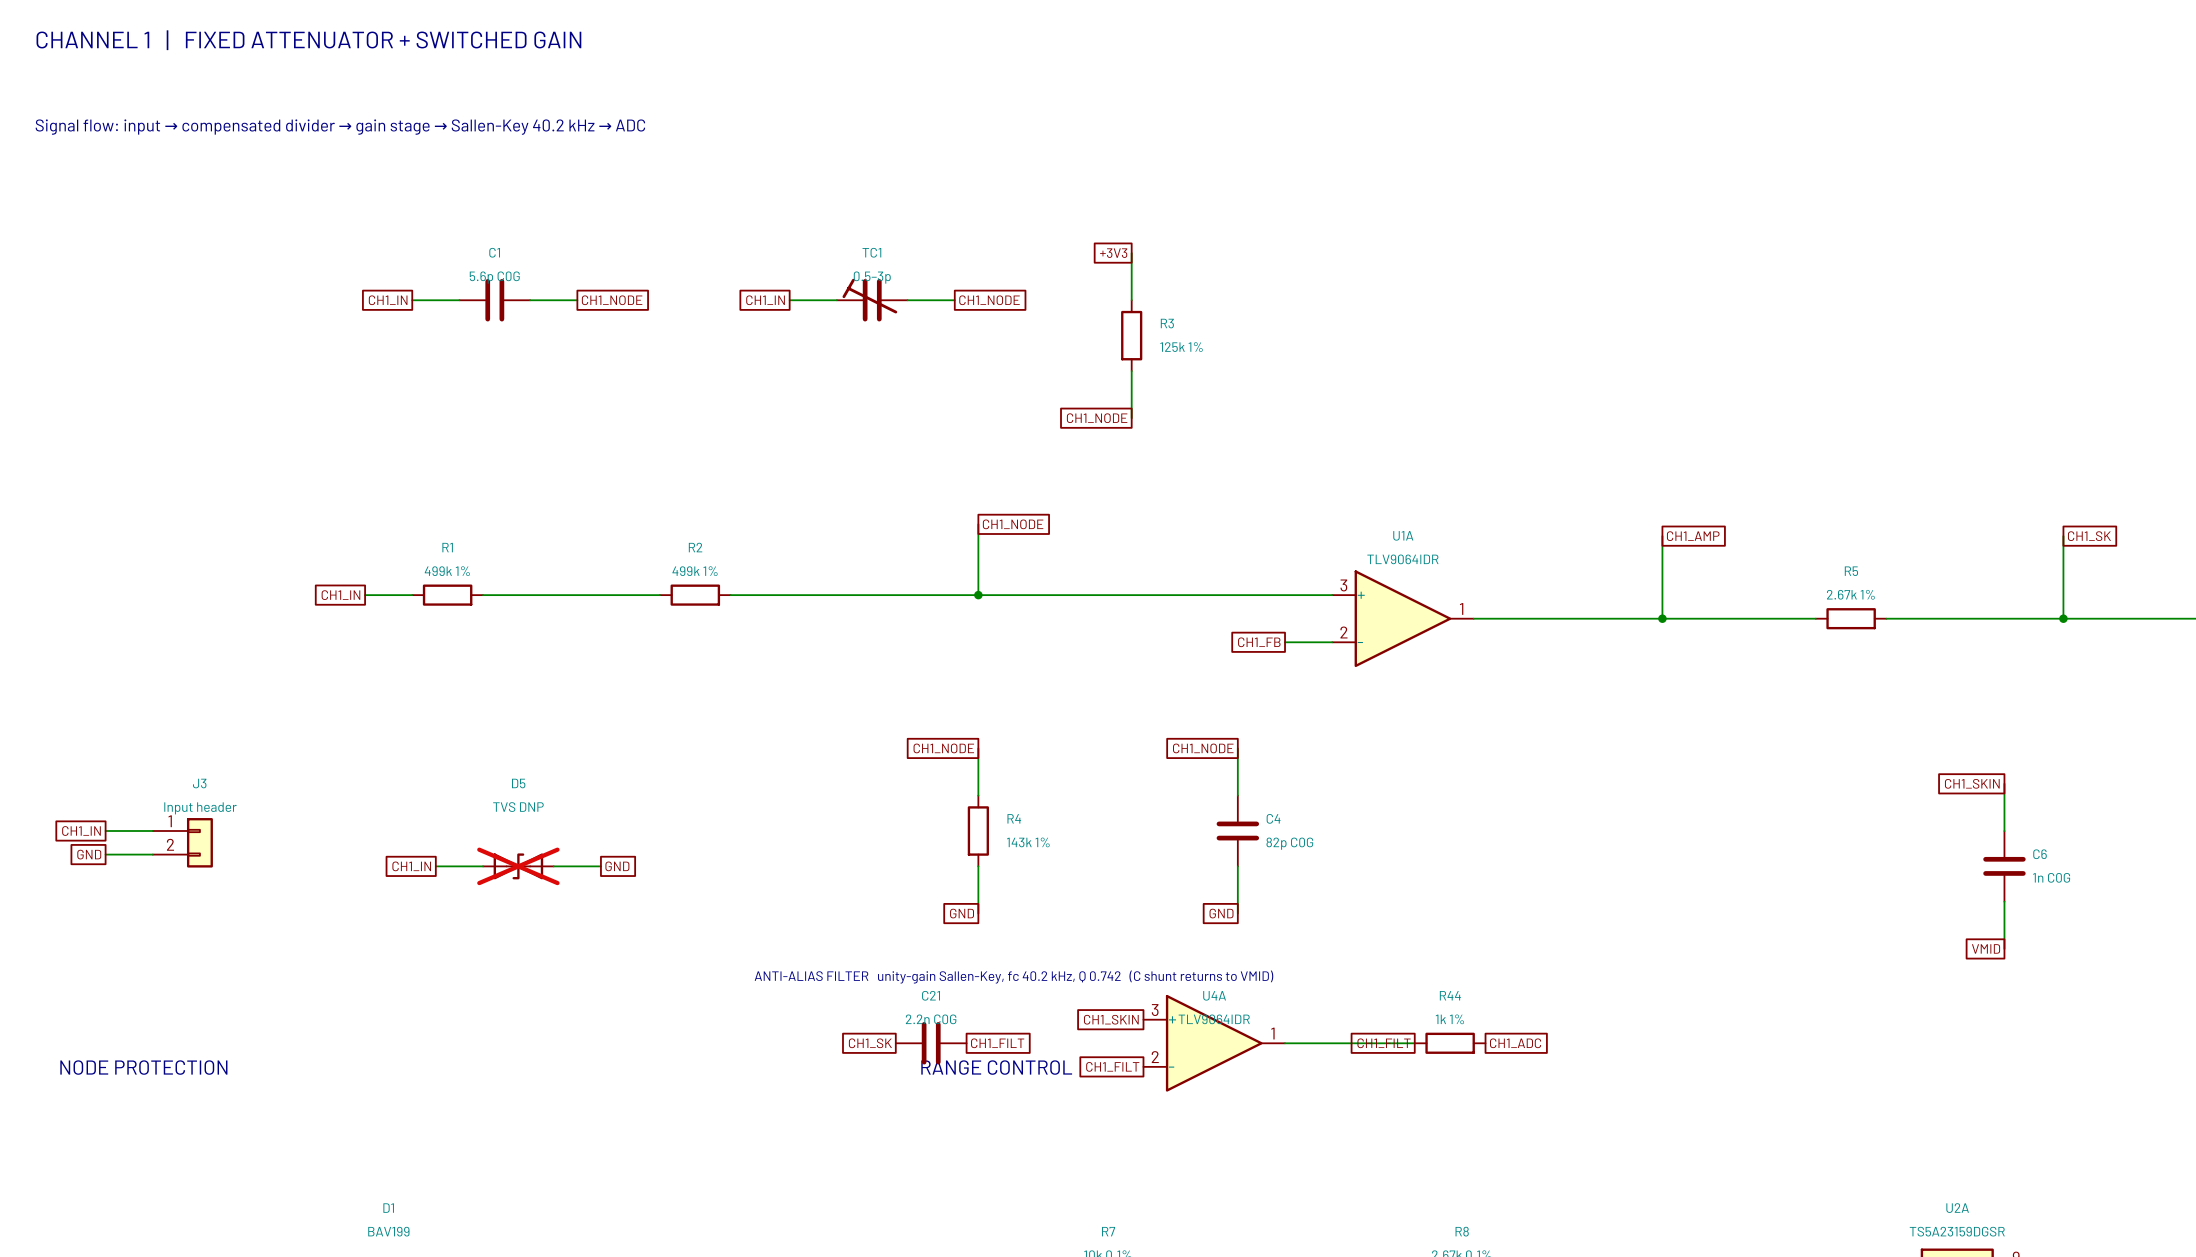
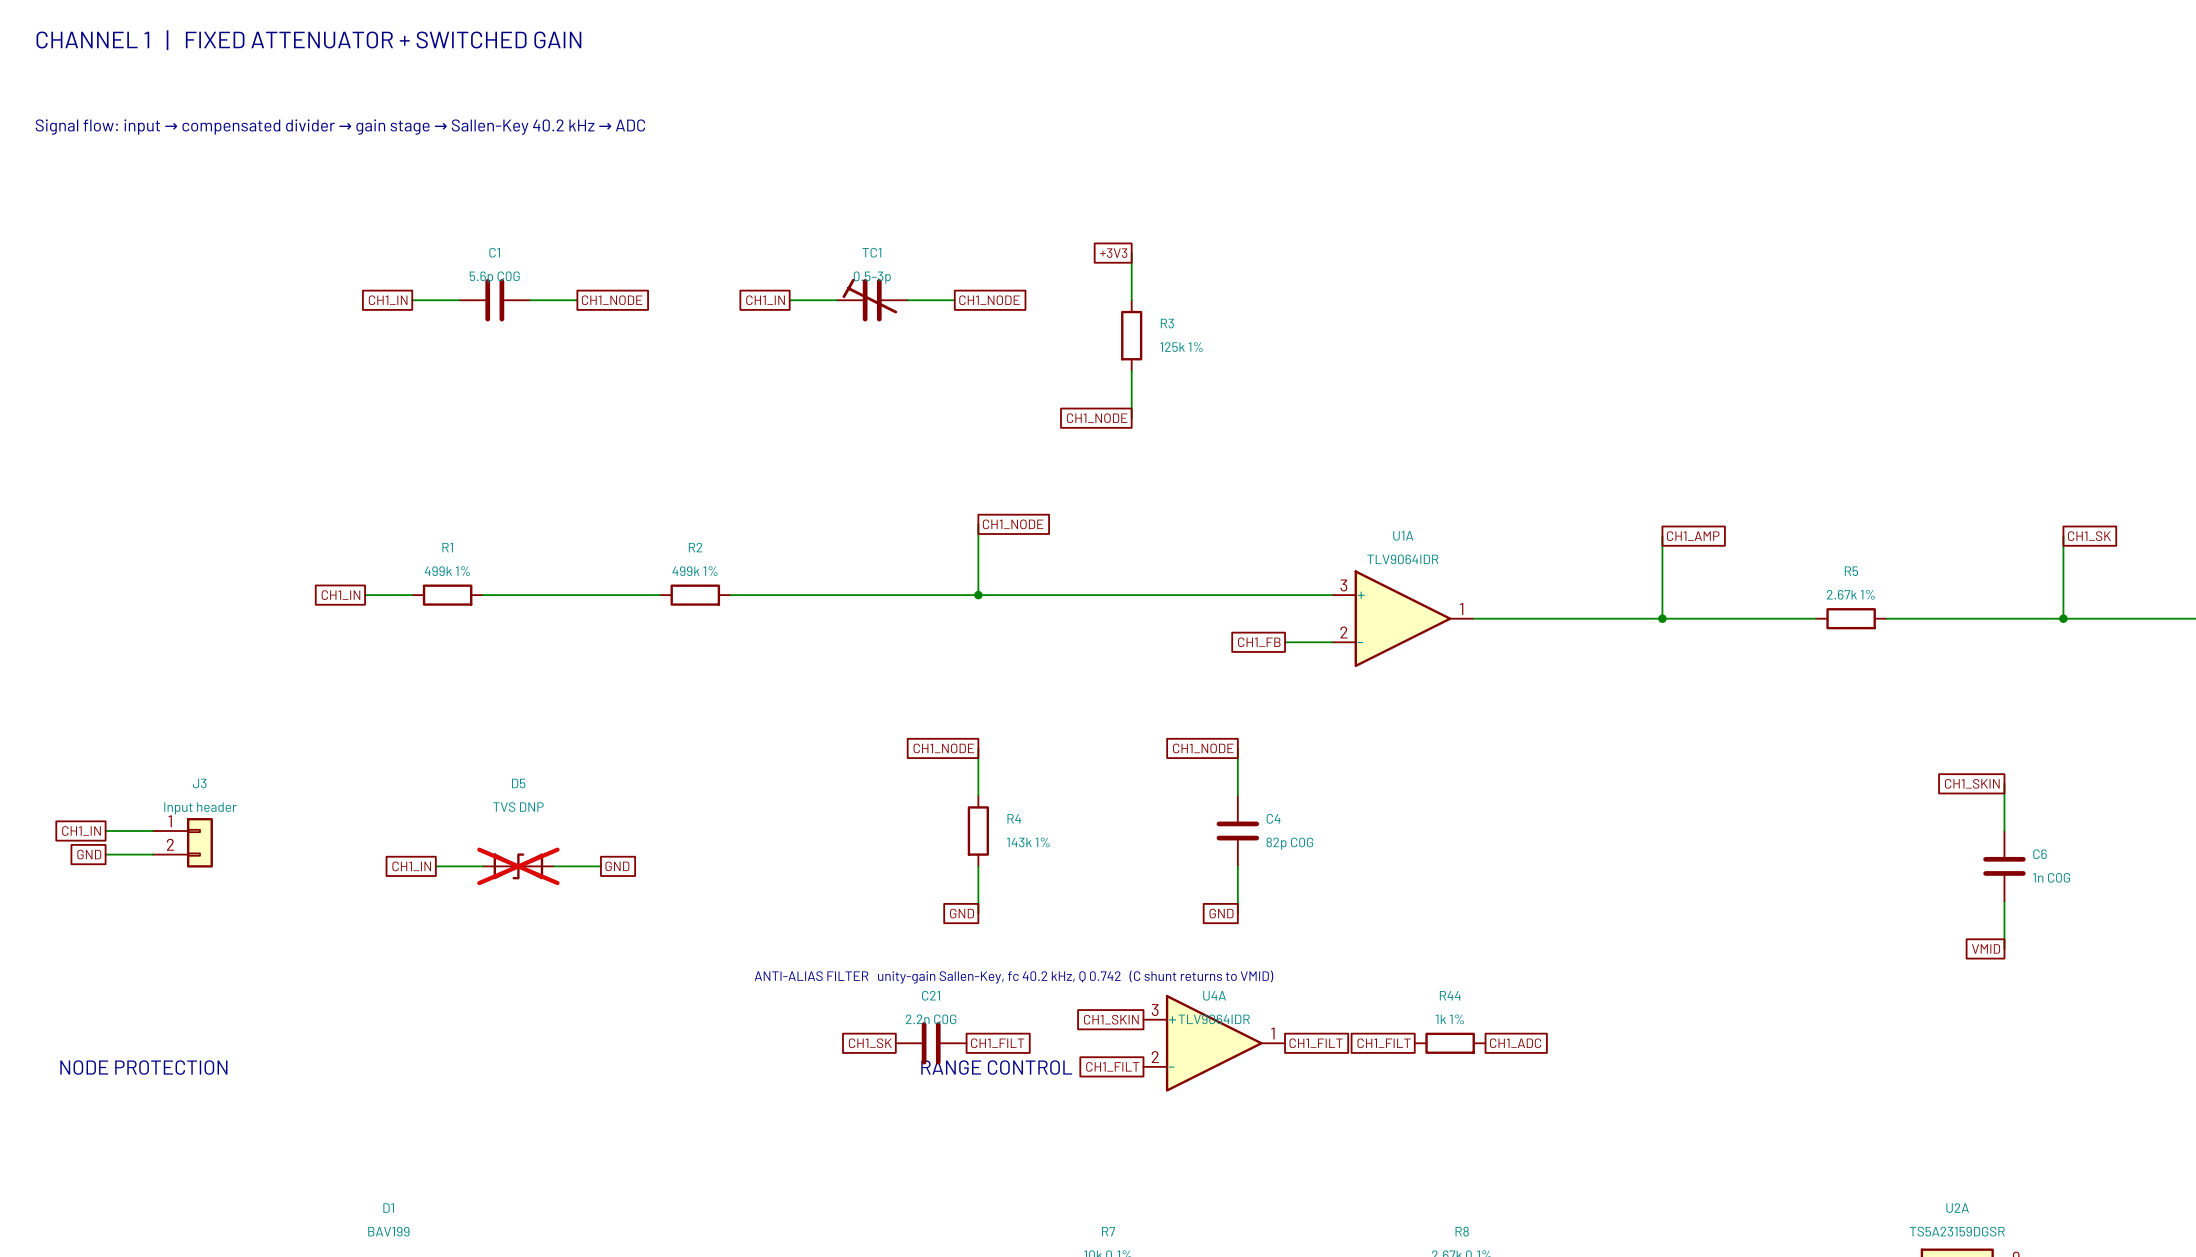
wire: (1285, 1043) (1414, 1043) -> none
global label: none -> CH1_FILT (1316, 1043)

